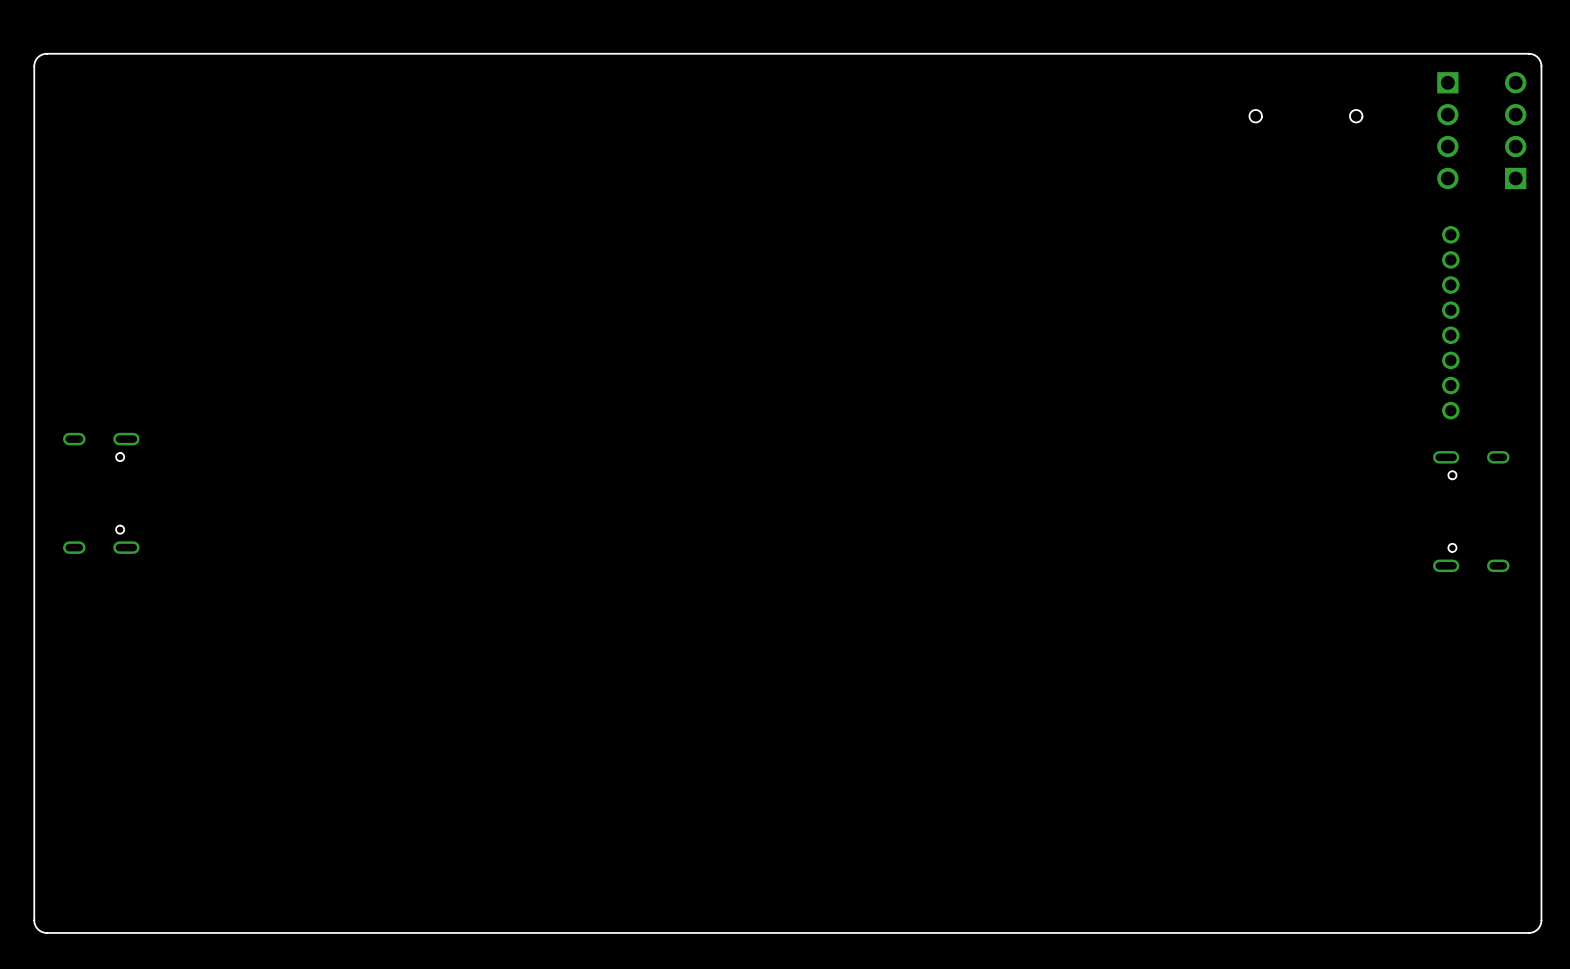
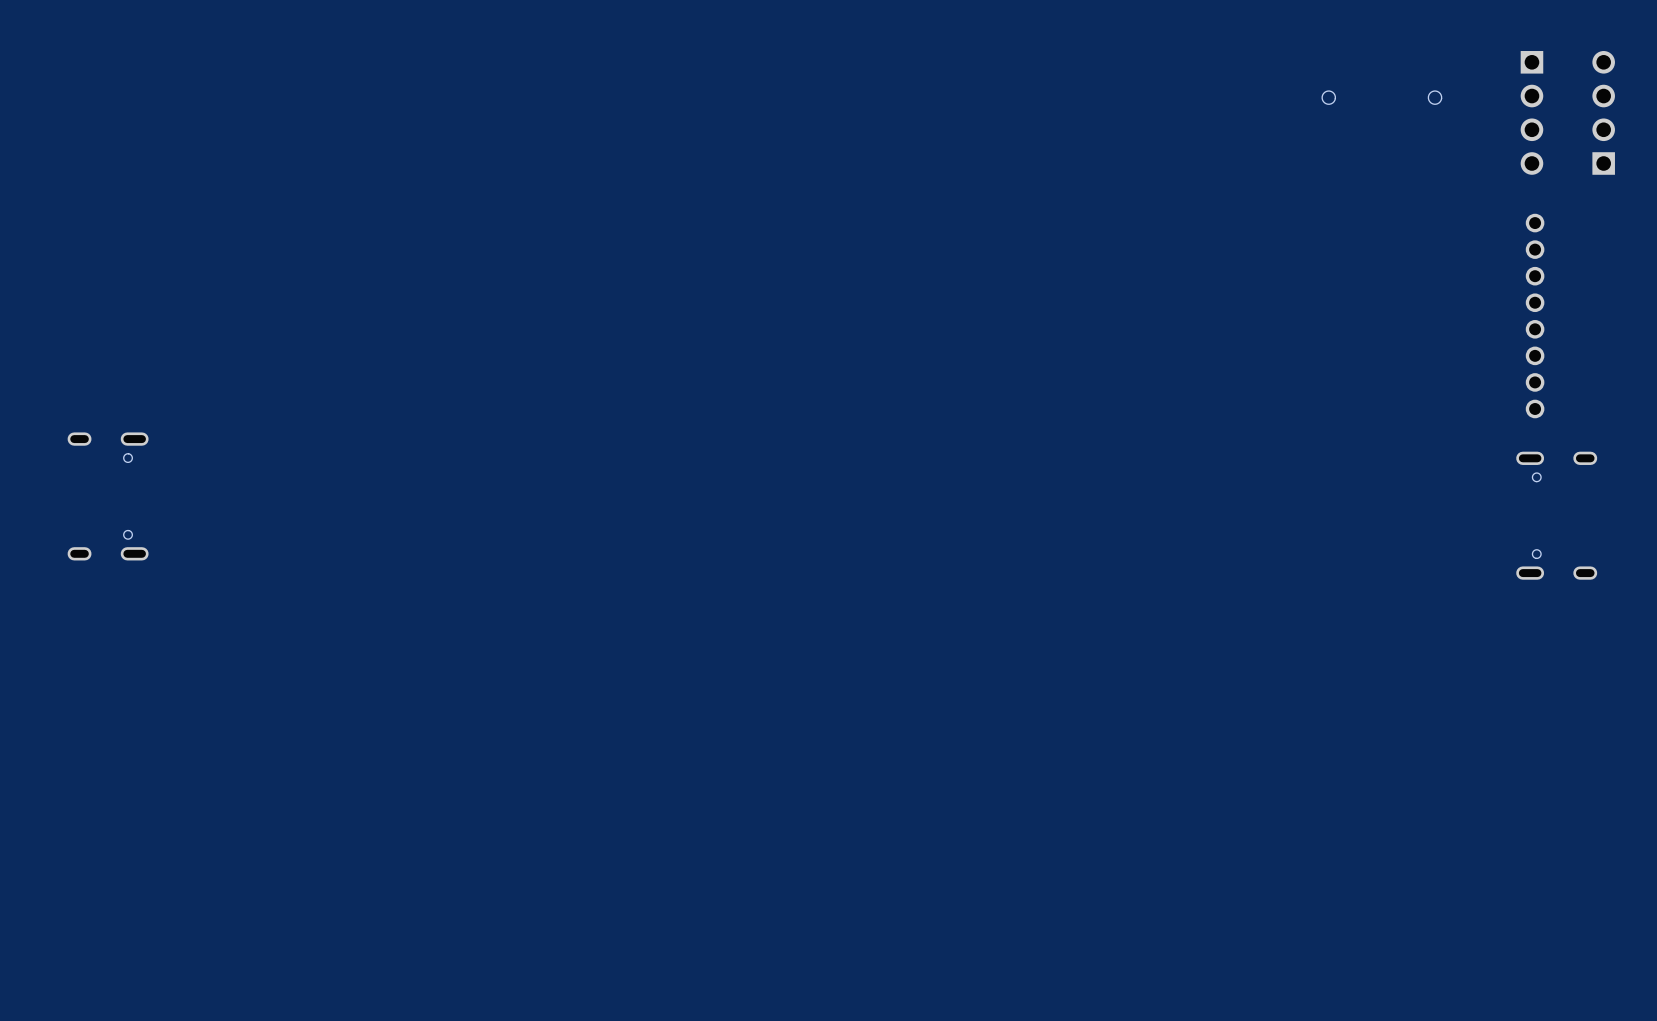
board edge: (1528, 53) (46, 53) (40, 55) (36, 59) (34, 66) (34, 920) (36, 927) (40, 931) (46, 932) (1528, 932) (1535, 931) (1539, 927) (1541, 920) (1541, 66) (1537, 57) (1528, 53) -> none

